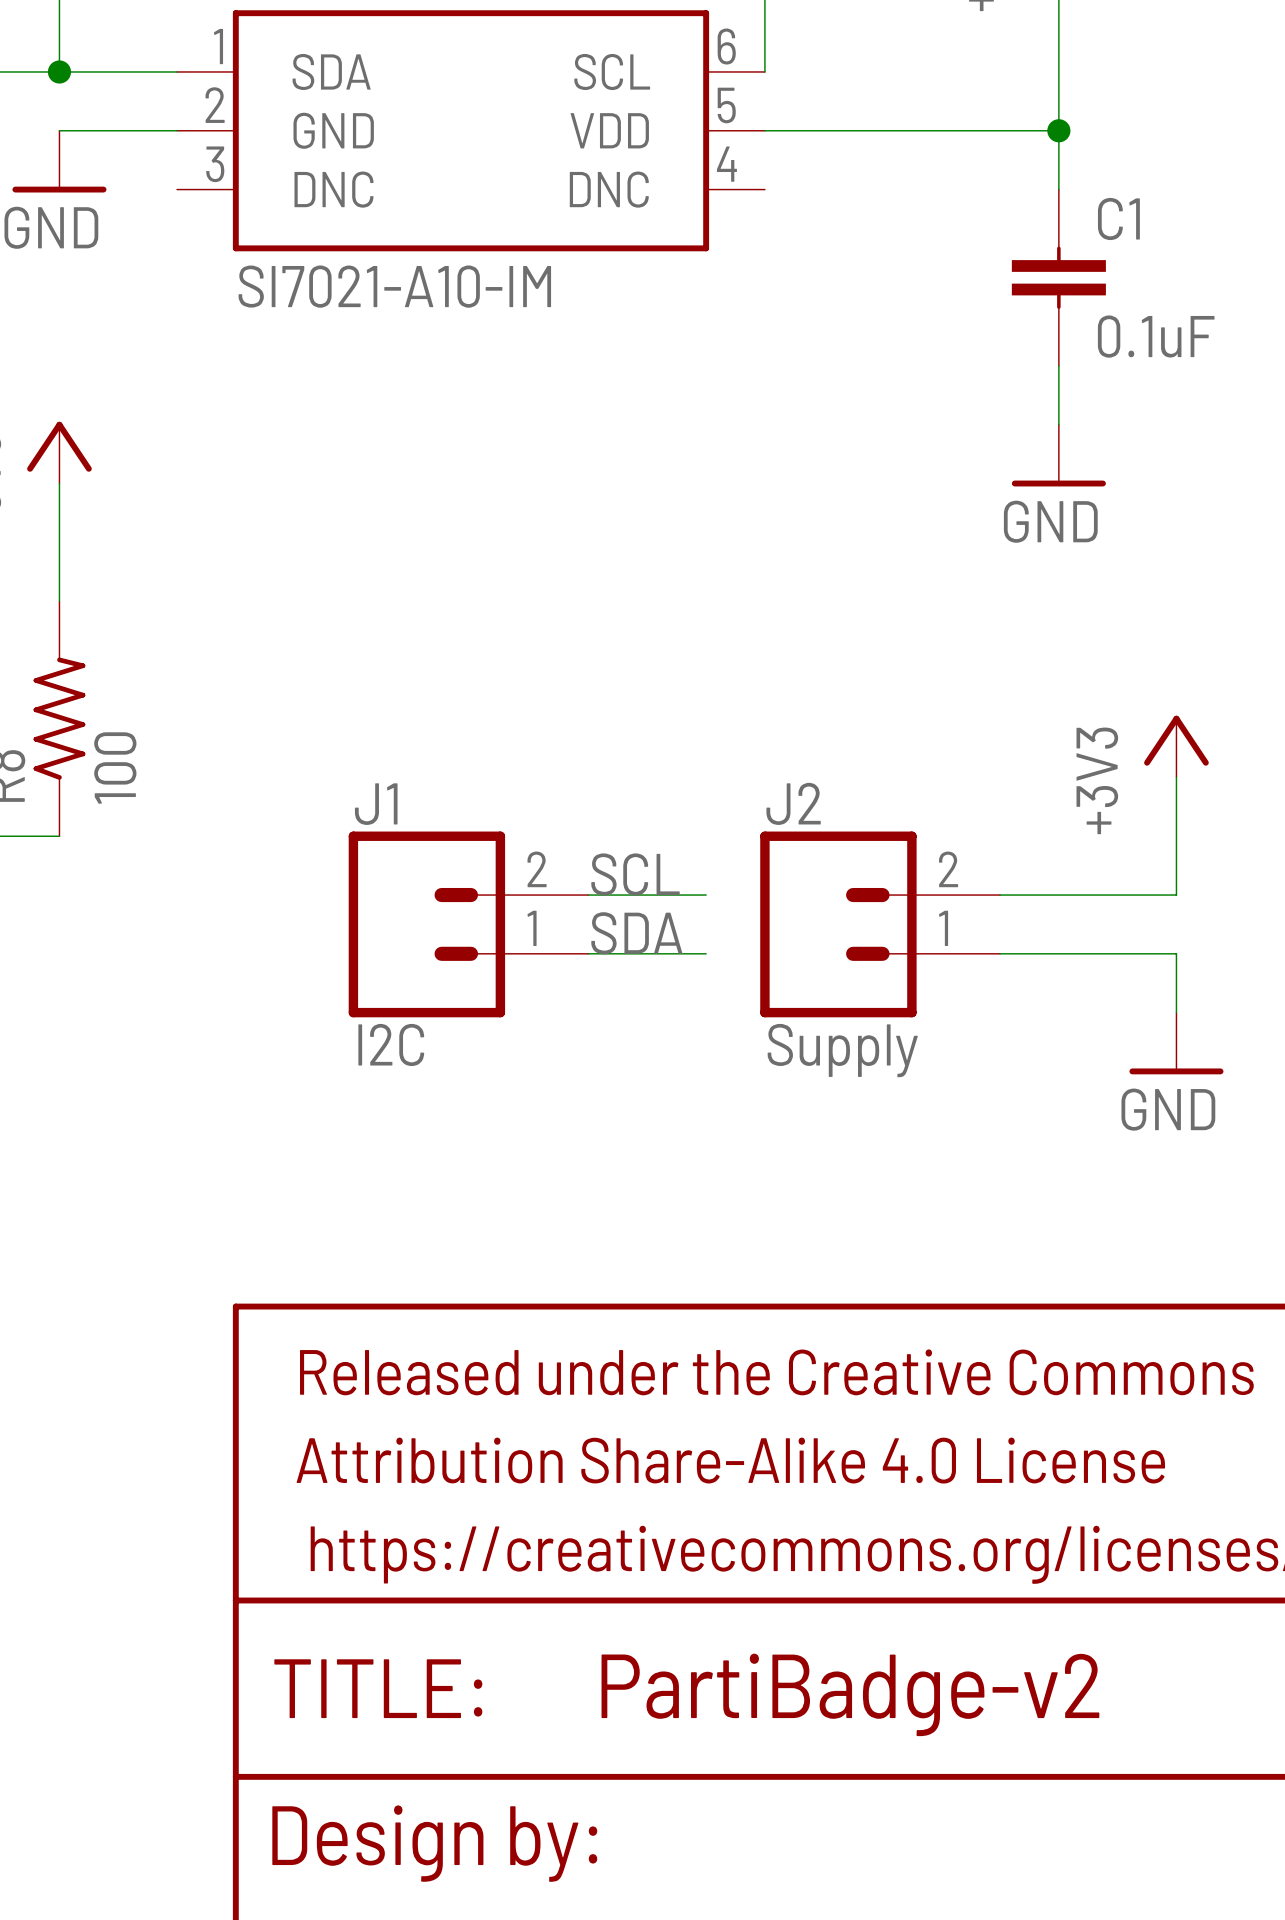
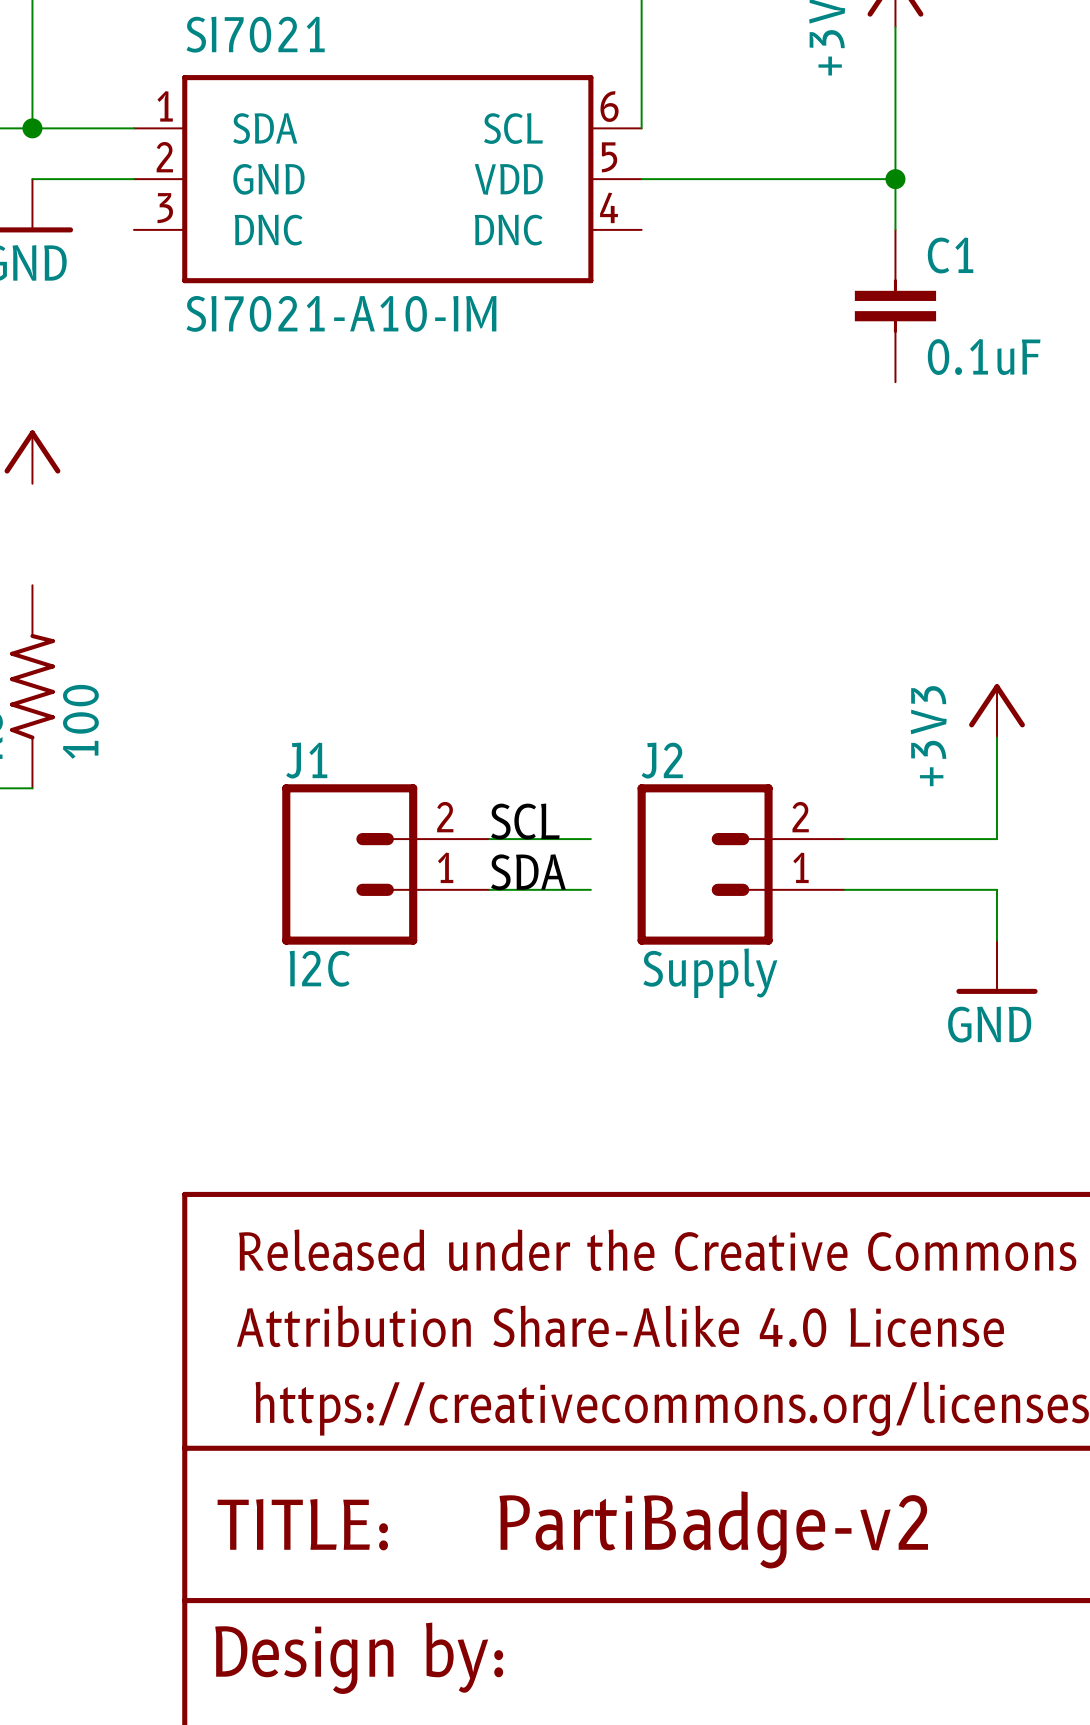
wire: (1058, 365) (1058, 424) -> none
power symbol: GND (1058, 455) -> none
wire: (59, 483) (59, 601) -> none

